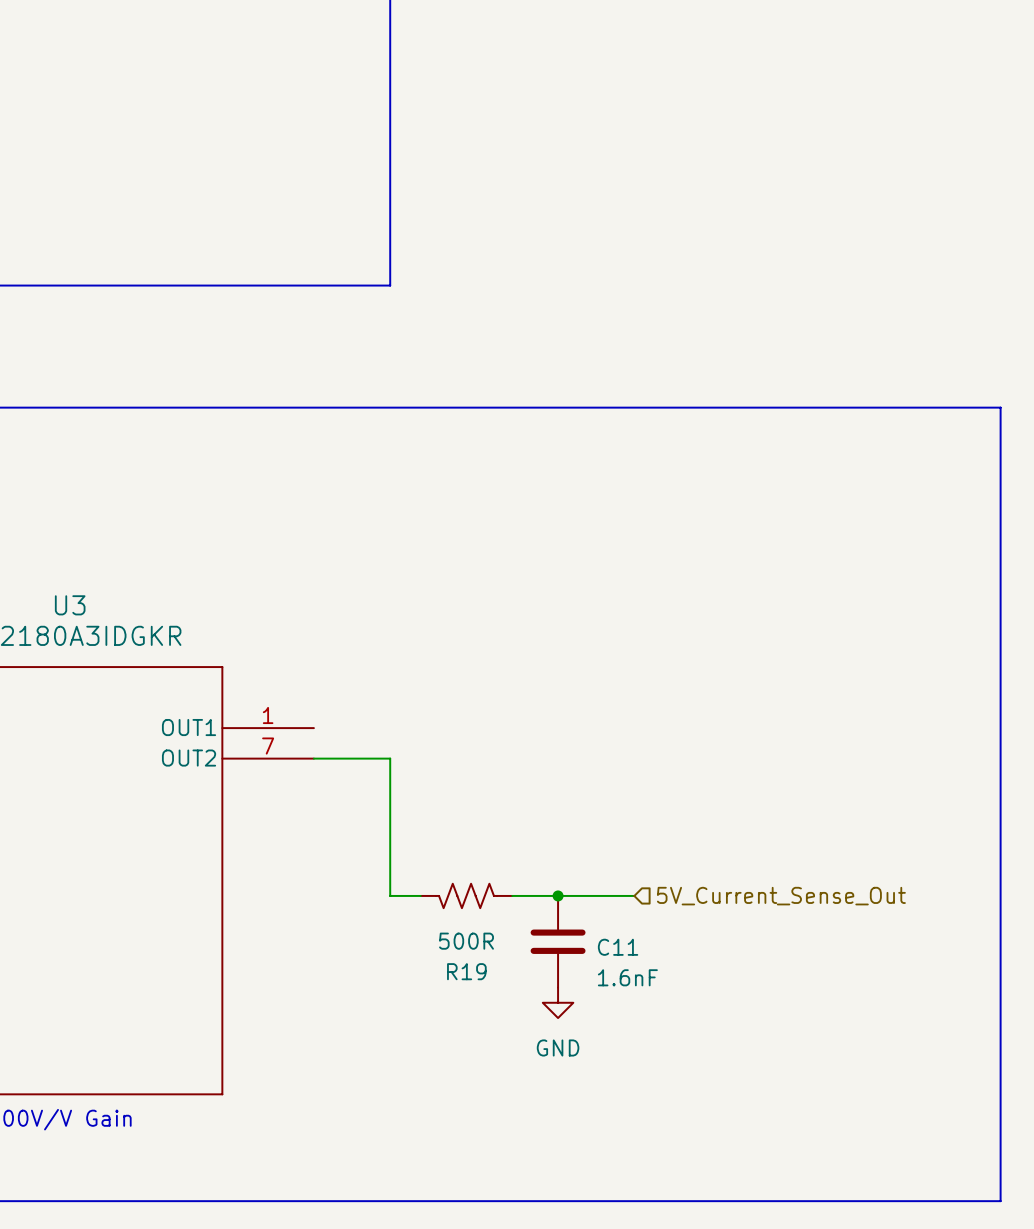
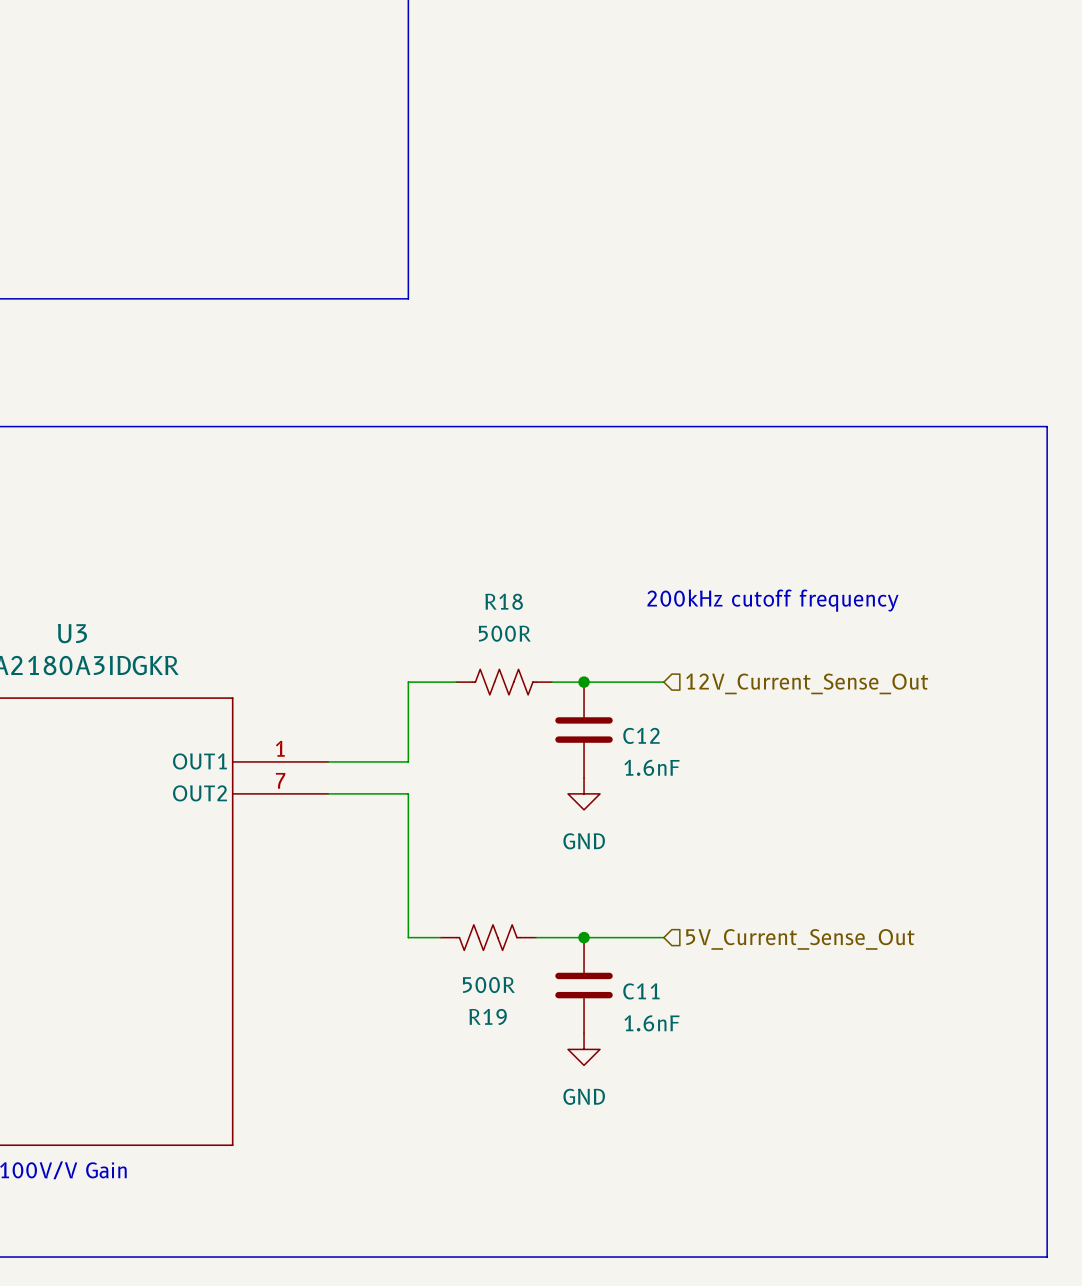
text: none -> 200kHz cutoff frequency (773, 600)
wire: none -> (456, 682) (408, 682) (408, 761) (328, 761)
R18: none -> 500R (504, 682)
wire: none -> (552, 682) (663, 682)
junction: none -> (584, 682)
hierarchical label: none -> 12V_Current_Sense_Out (807, 683)
C12: none -> 1.6nF (584, 730)
power symbol: none -> GND (584, 793)

